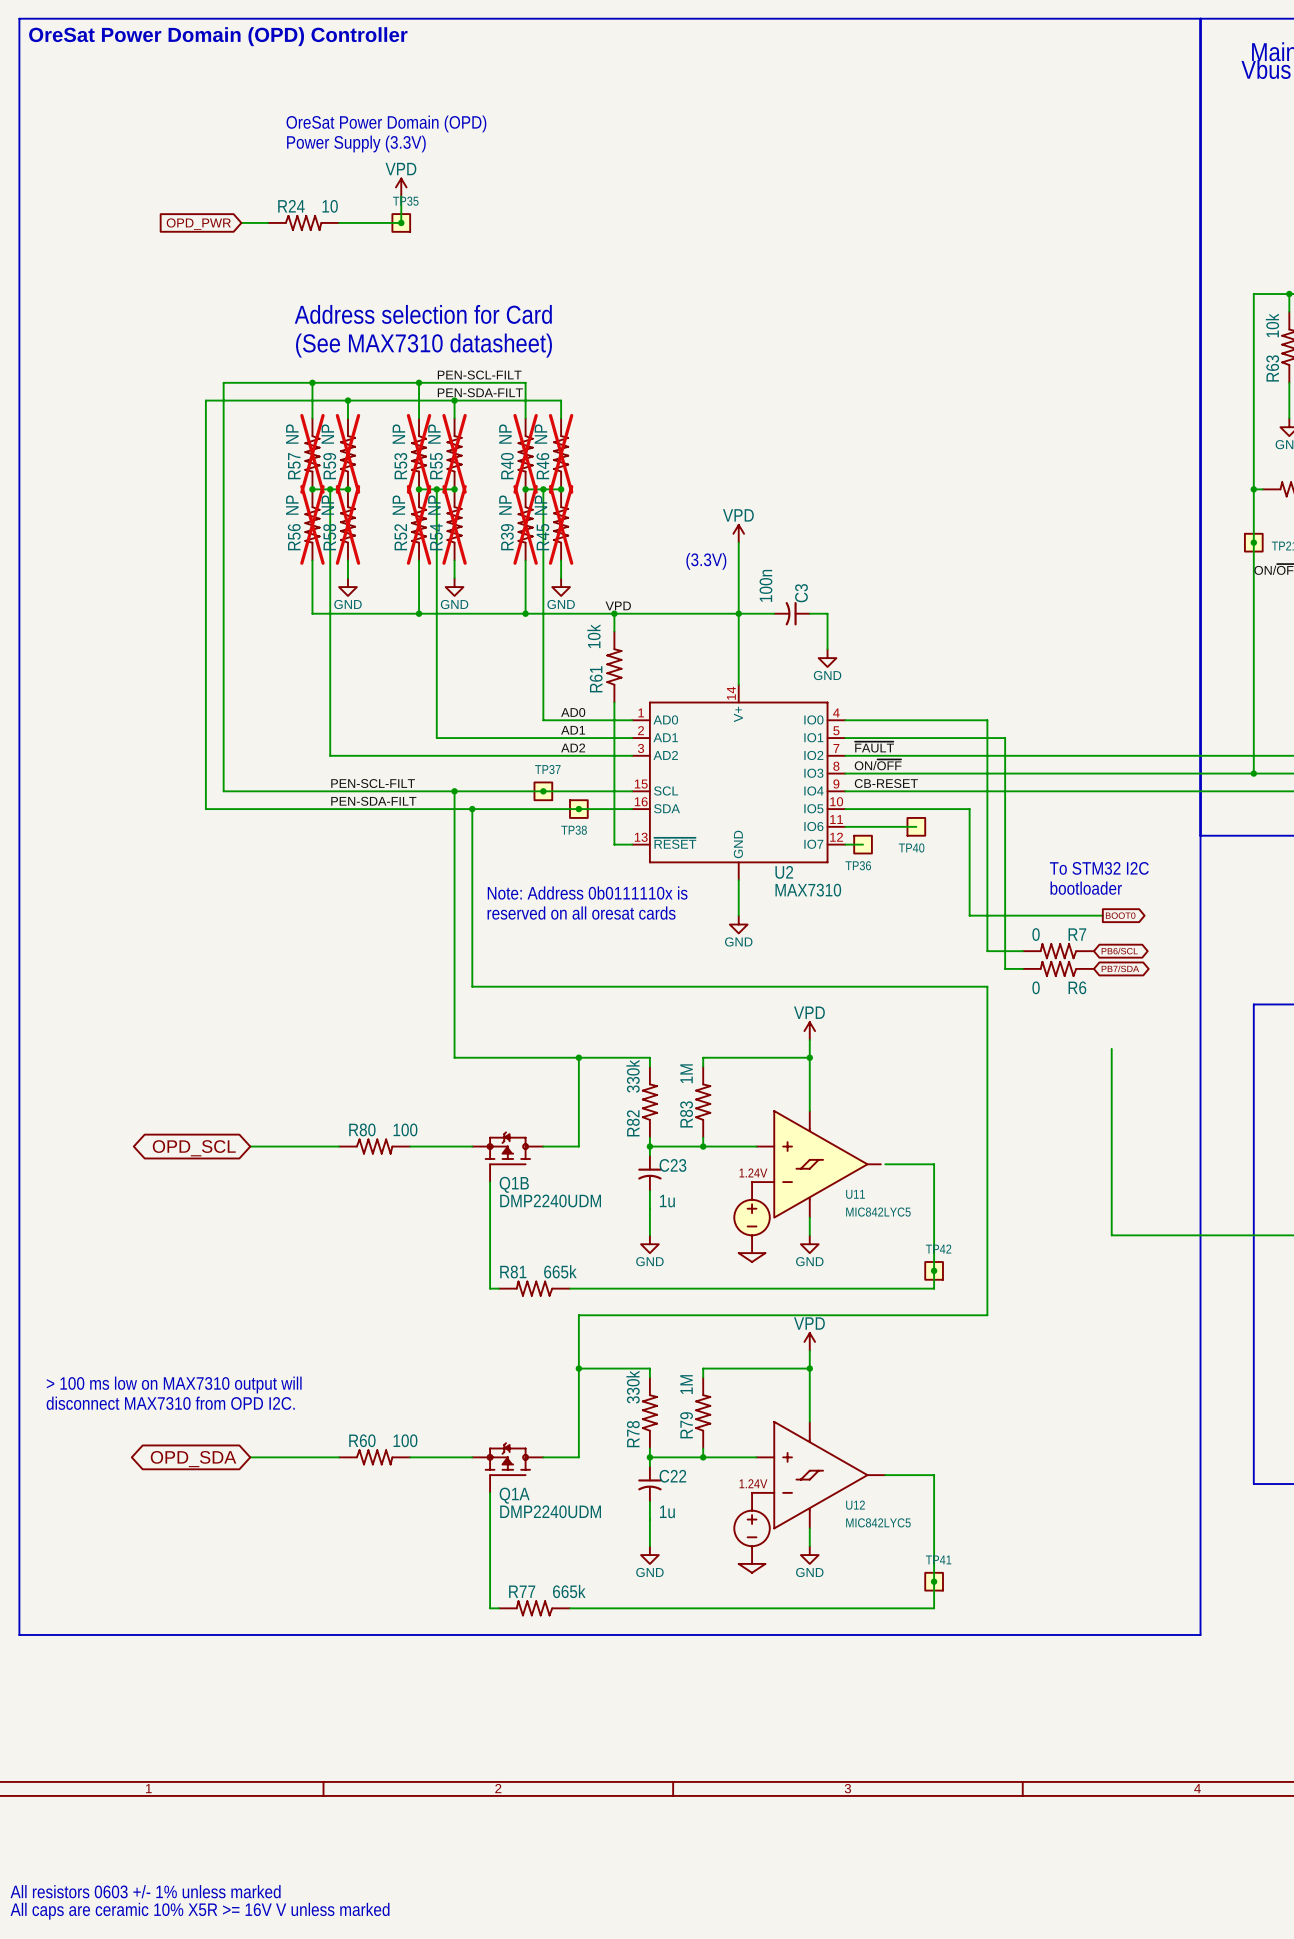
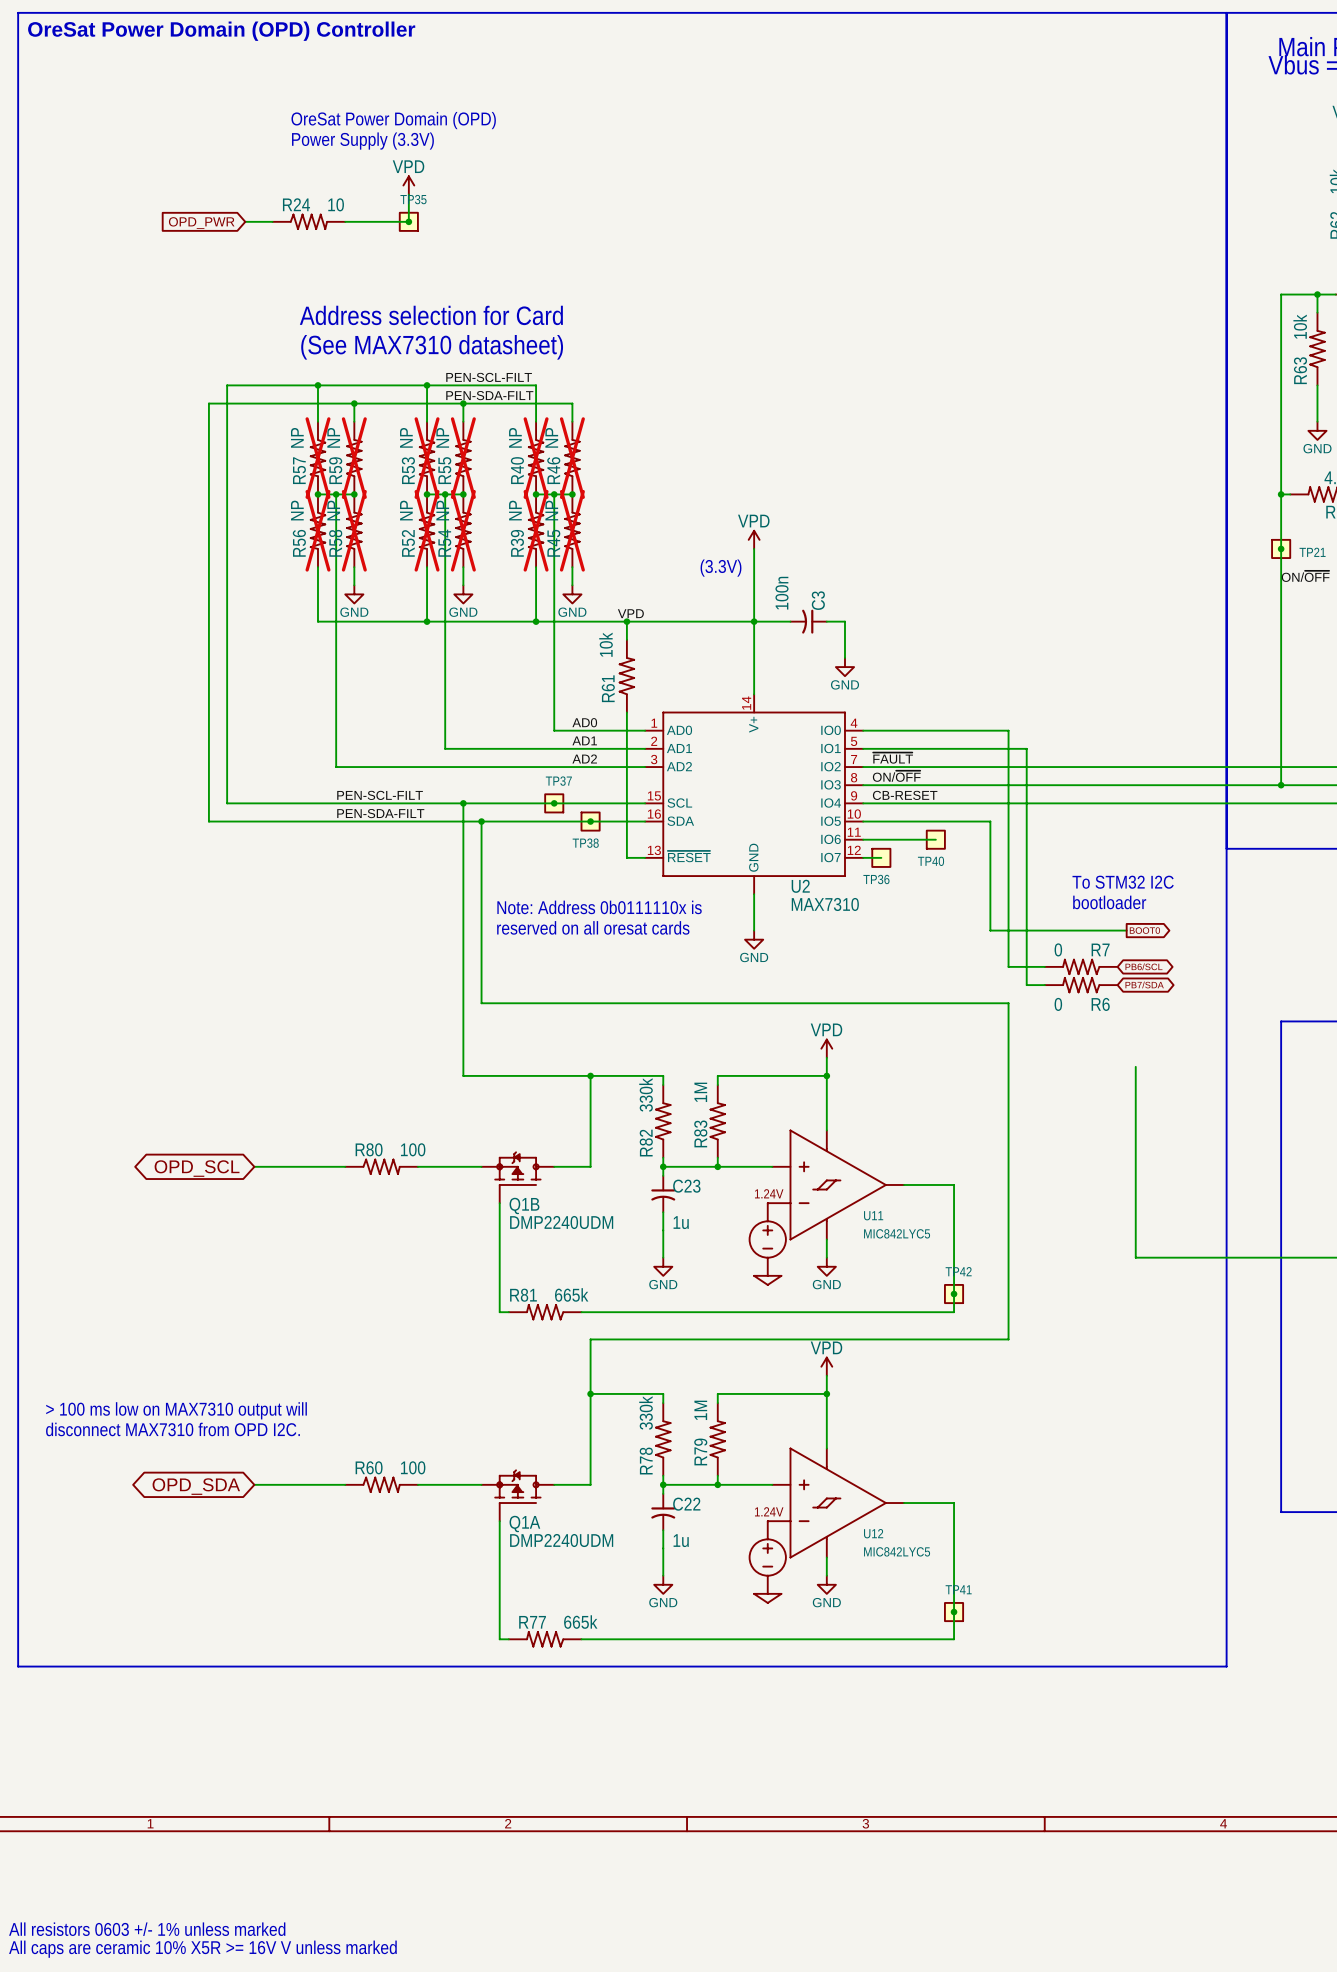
U11 symbol: [733, 1110, 881, 1263] -> [748, 1129, 905, 1286]

